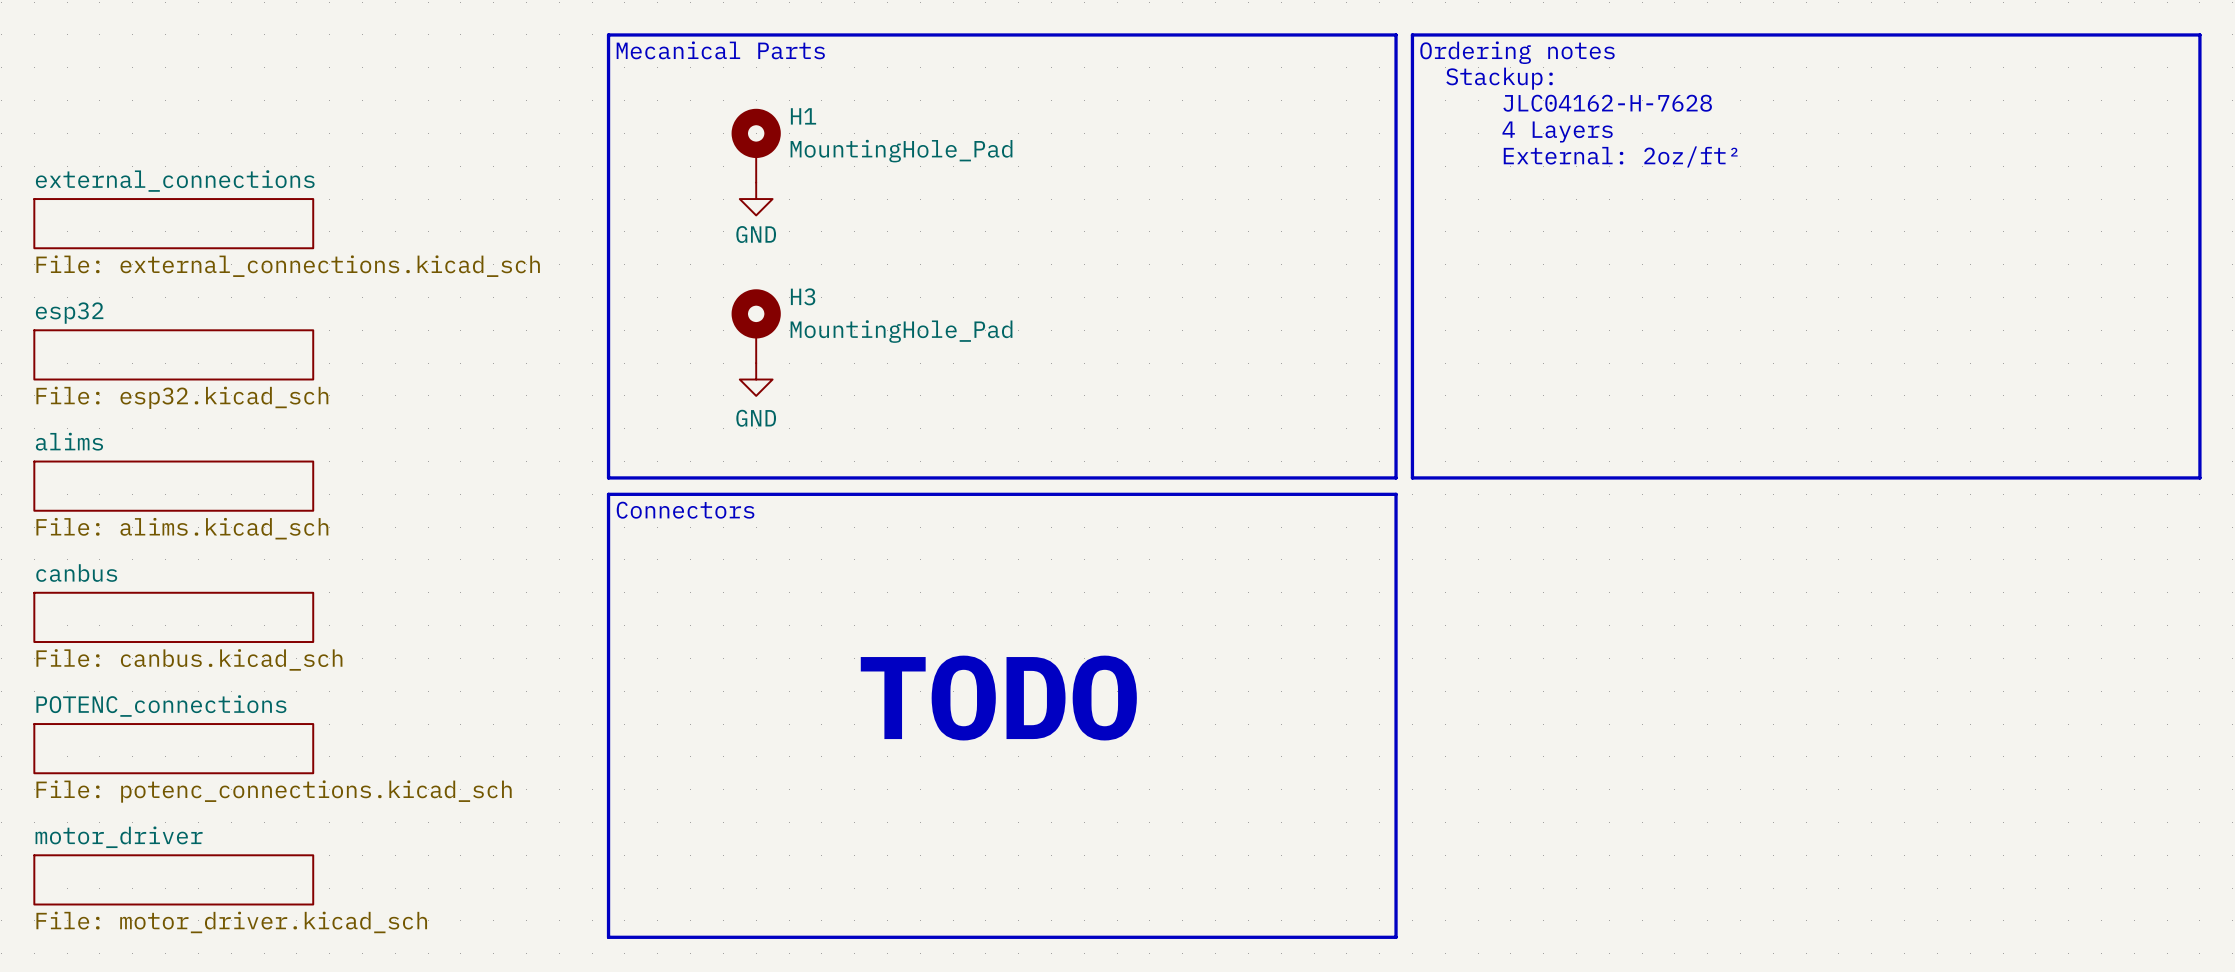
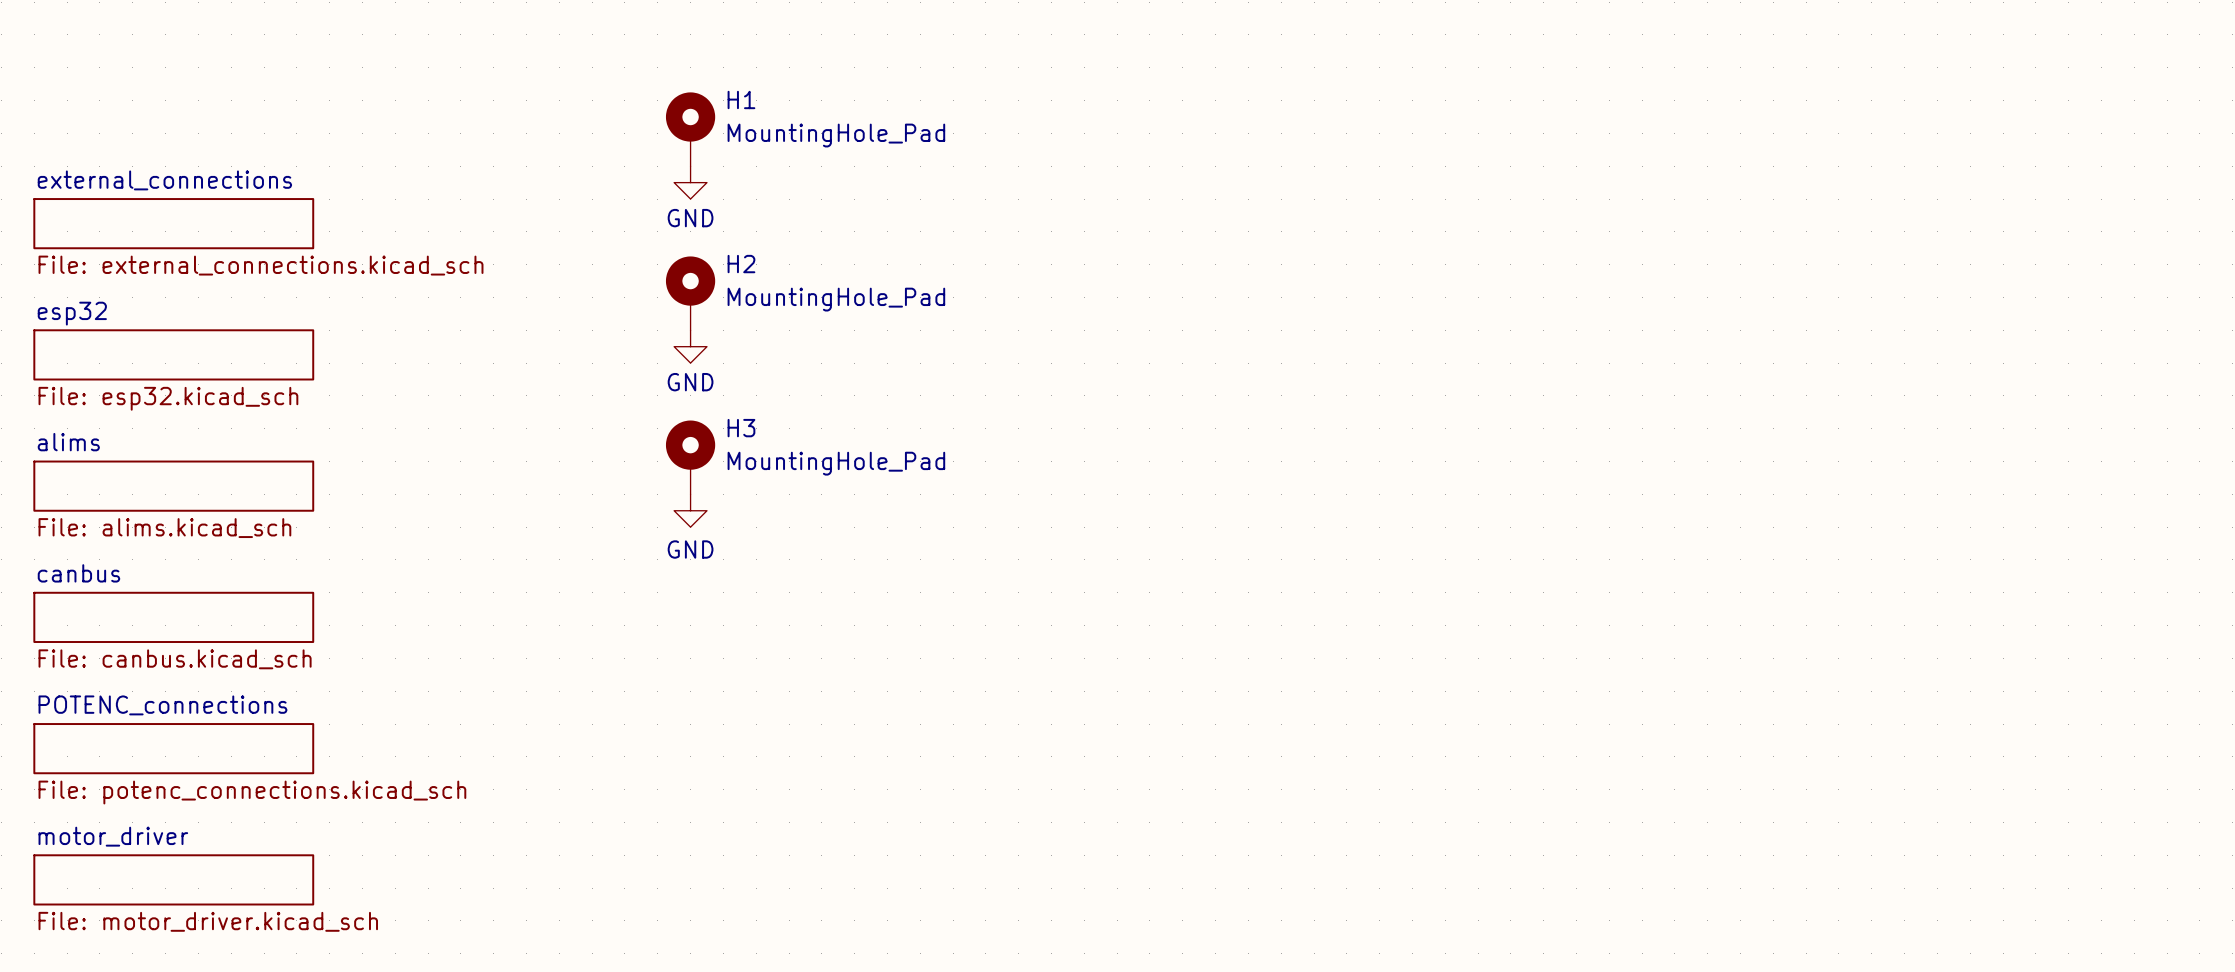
line: (608, 34) (1396, 34) (1396, 477) (608, 477) (608, 34) -> none
line: (1412, 34) (2199, 34) (2199, 477) (1412, 477) (1412, 34) -> none
text: Mecanical Parts (720, 50) -> none
text: Ordering notes (1517, 52) -> none
text: Stackup: (1499, 78) -> none
text: JLC04162-H-7628 (1607, 103) -> none
text: 4 Layers (1557, 132) -> none
H1 position: (756, 145) -> (690, 129)
text: External: 2oz/ft² (1620, 156) -> none
power symbol position: GND (756, 199) -> GND (690, 182)
H2: none -> MountingHole_Pad (690, 293)
H3 position: (756, 326) -> (690, 457)
power symbol: none -> GND (690, 346)
power symbol: GND (756, 379) -> none
line: (608, 494) (1396, 494) (1396, 937) (608, 937) (608, 494) -> none
text: Connectors (685, 510) -> none
power symbol: none -> GND (690, 510)
text: TODO (998, 698) -> none

